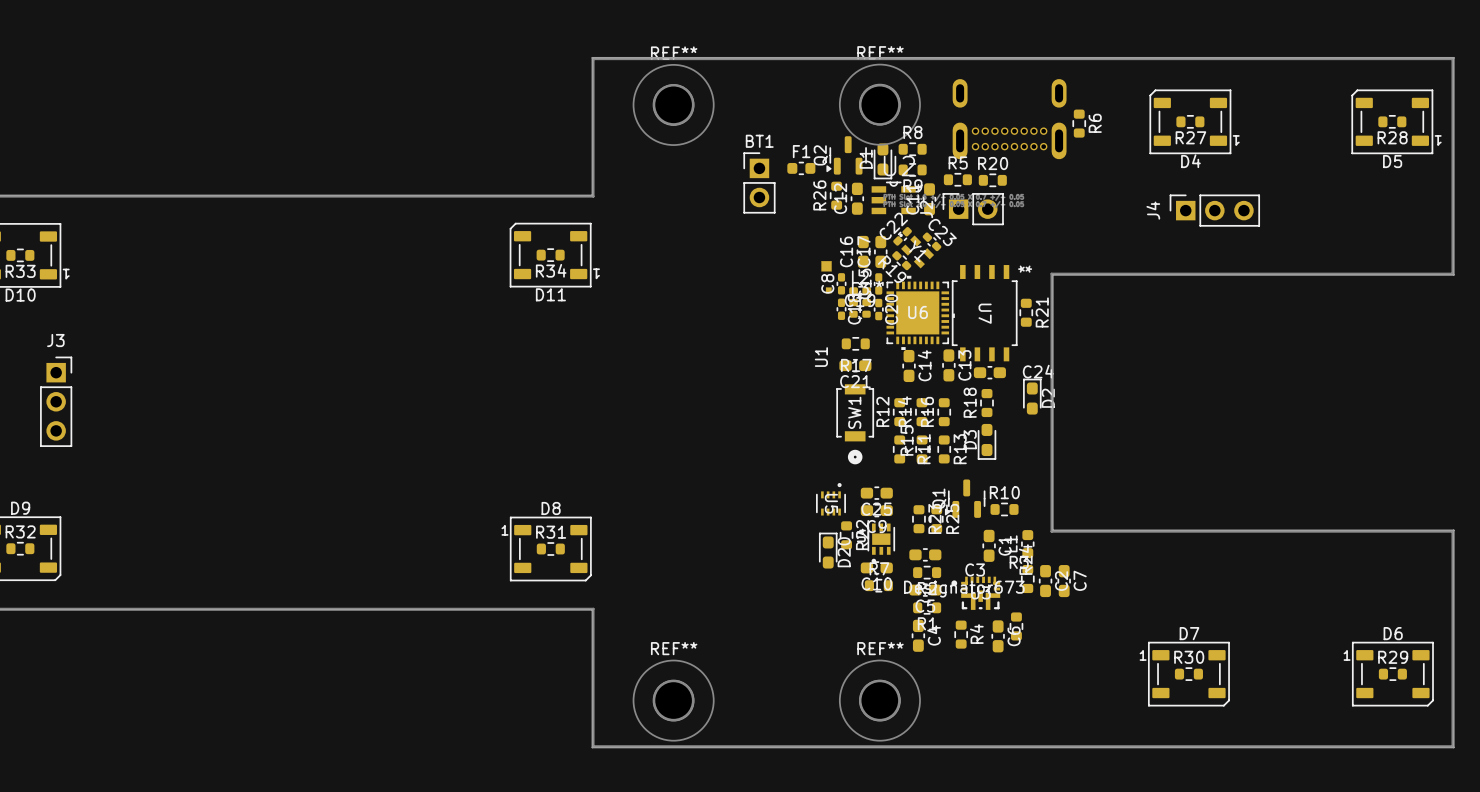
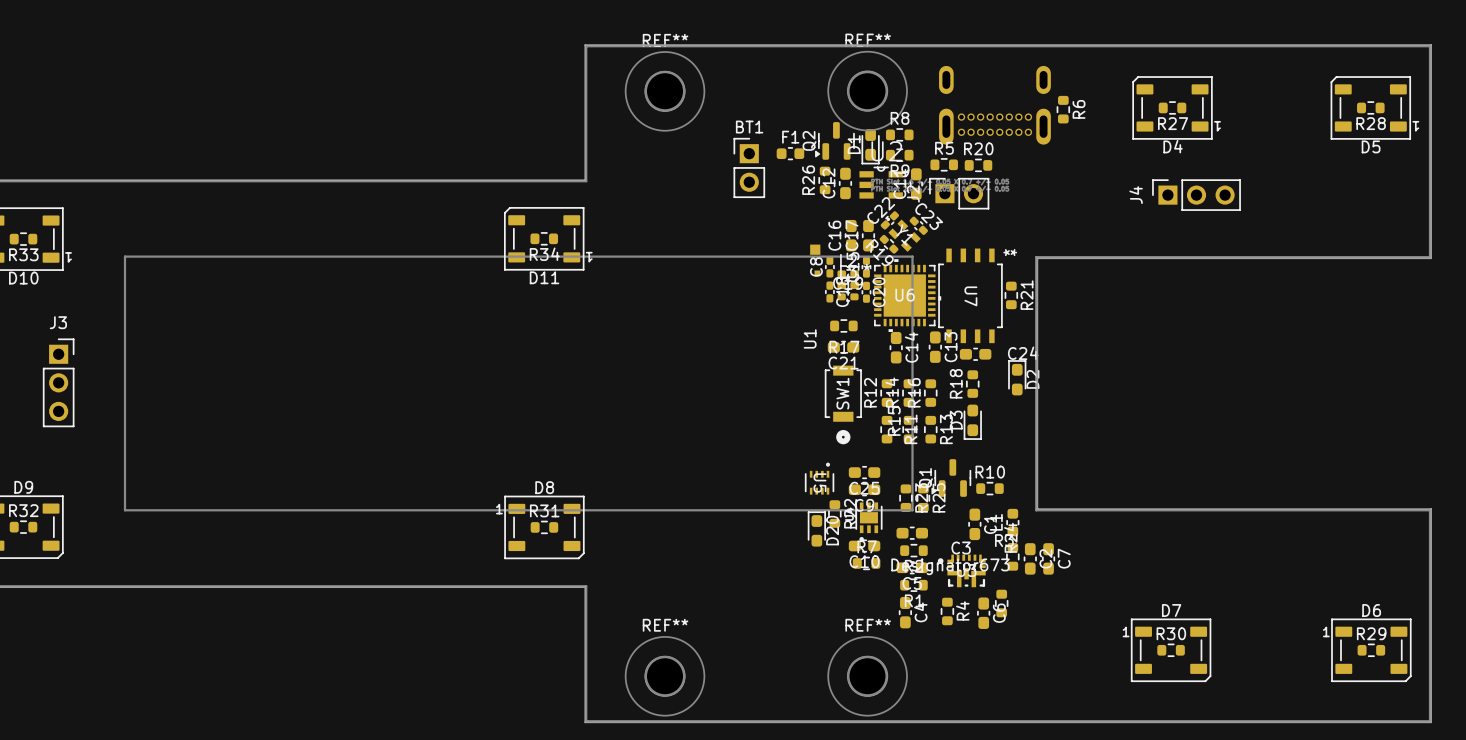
line: none -> (124, 256) (912, 256) (912, 510) (124, 510) (124, 256)

